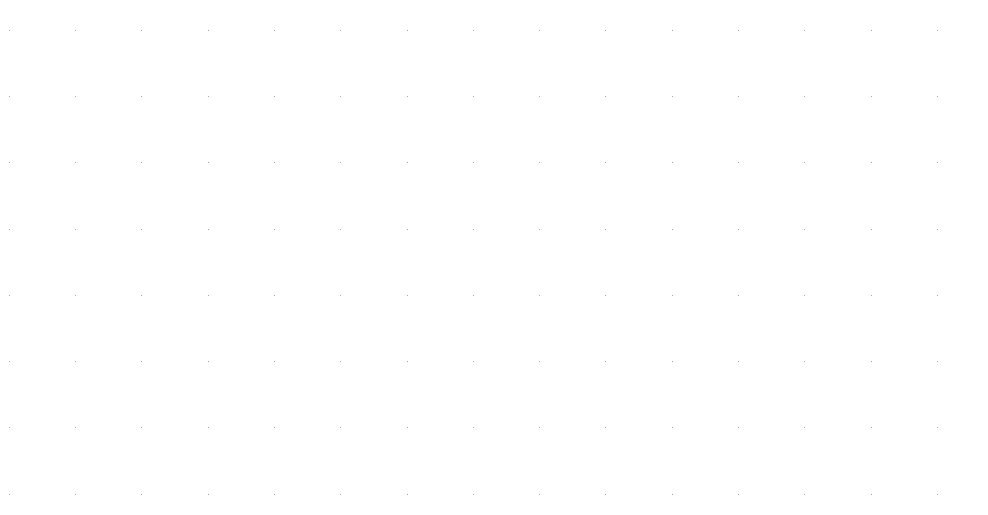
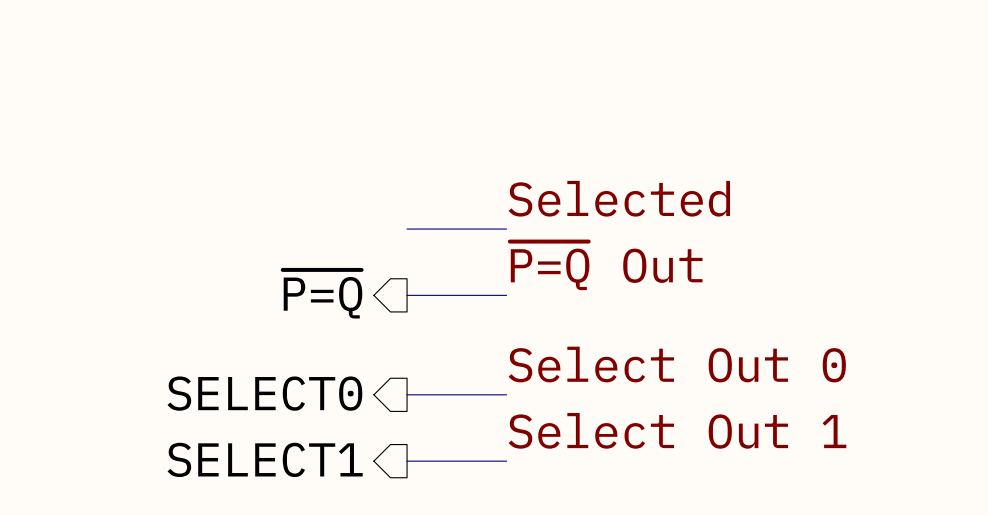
label: none -> Selected (619, 198)
wire: none -> (407, 229) (506, 229)
label: none -> ~{P=Q} Out (606, 265)
sheet pin: none -> ~{P=Q} (322, 294)
wire: none -> (407, 295) (506, 295)
label: none -> Select Out 0 (677, 364)
sheet pin: none -> SELECT0 (264, 393)
wire: none -> (407, 394) (506, 394)
label: none -> Select Out 1 (677, 430)
sheet pin: none -> SELECT1 (265, 459)
wire: none -> (407, 461) (506, 461)

